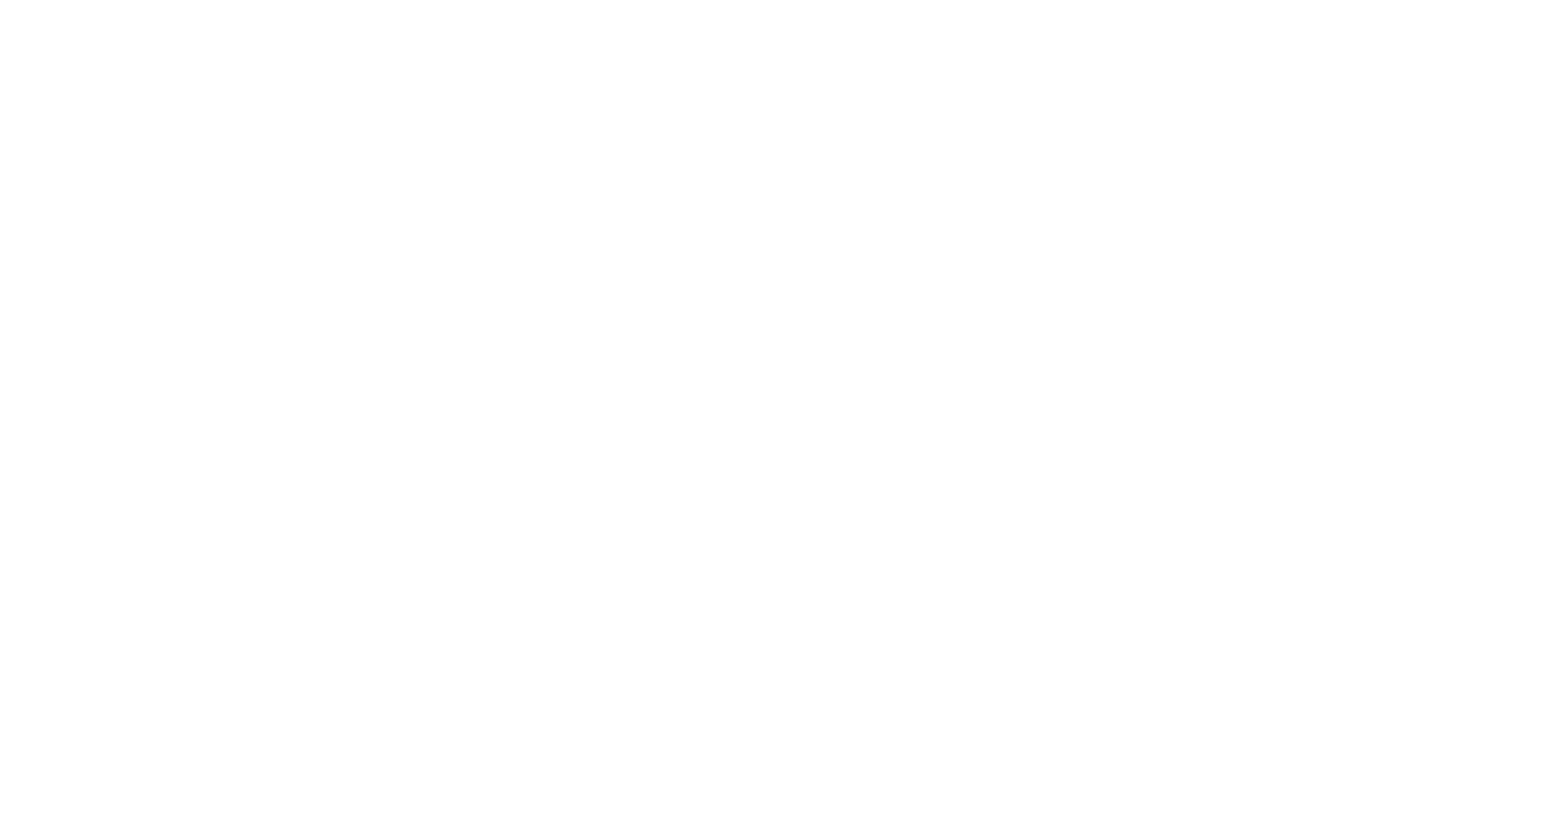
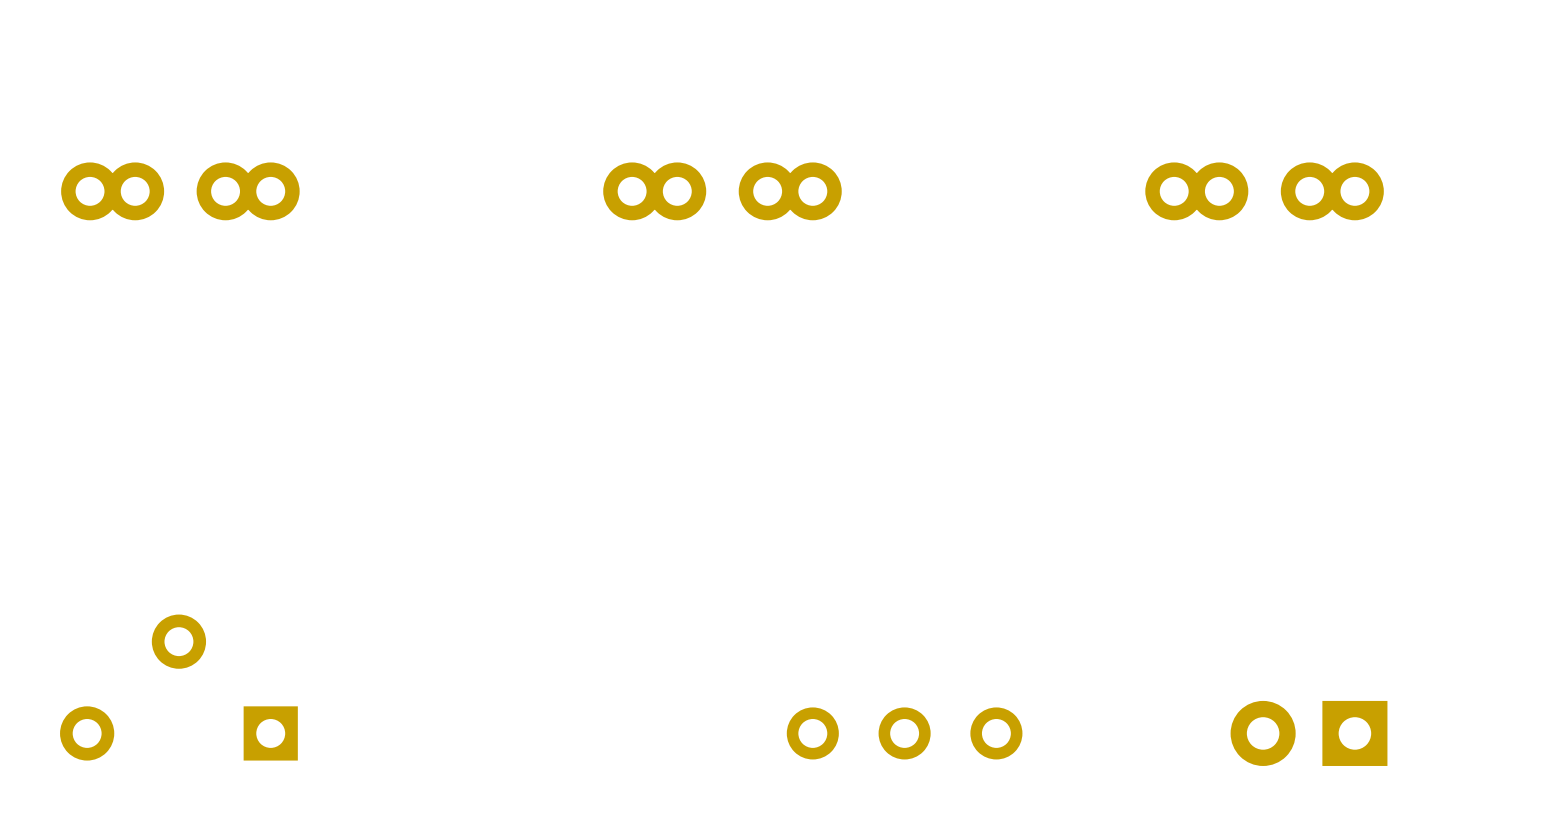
part: none -> (180, 191)
part: none -> (722, 191)
part: none -> (1264, 191)
part: none -> (178, 687)
part: none -> (904, 733)
part: none -> (1309, 733)

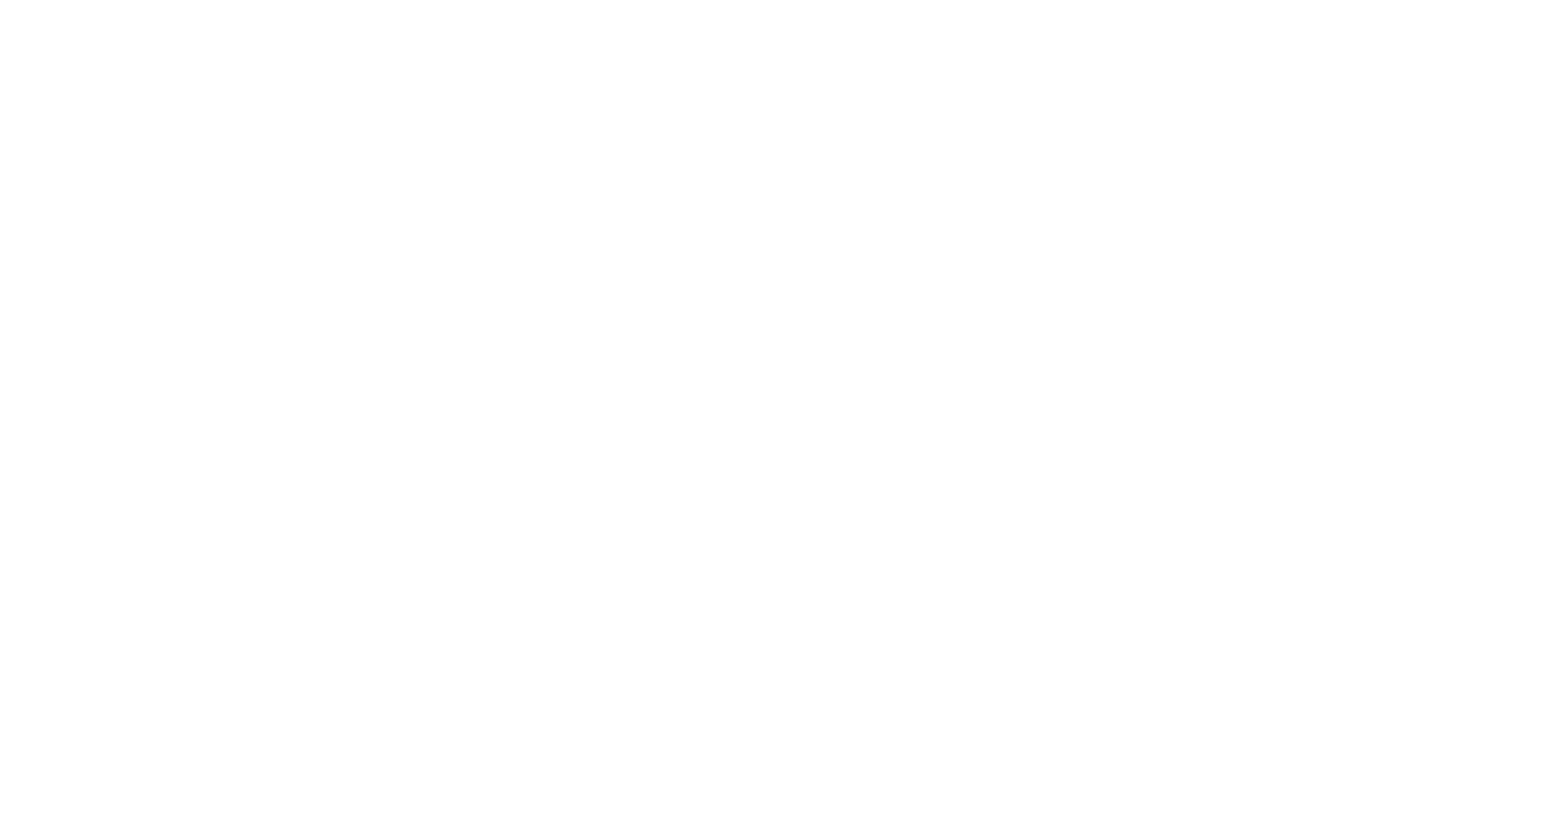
part: (180, 191) -> none
part: (722, 191) -> none
part: (1264, 191) -> none
part: (178, 687) -> none
part: (904, 733) -> none
part: (1309, 733) -> none

